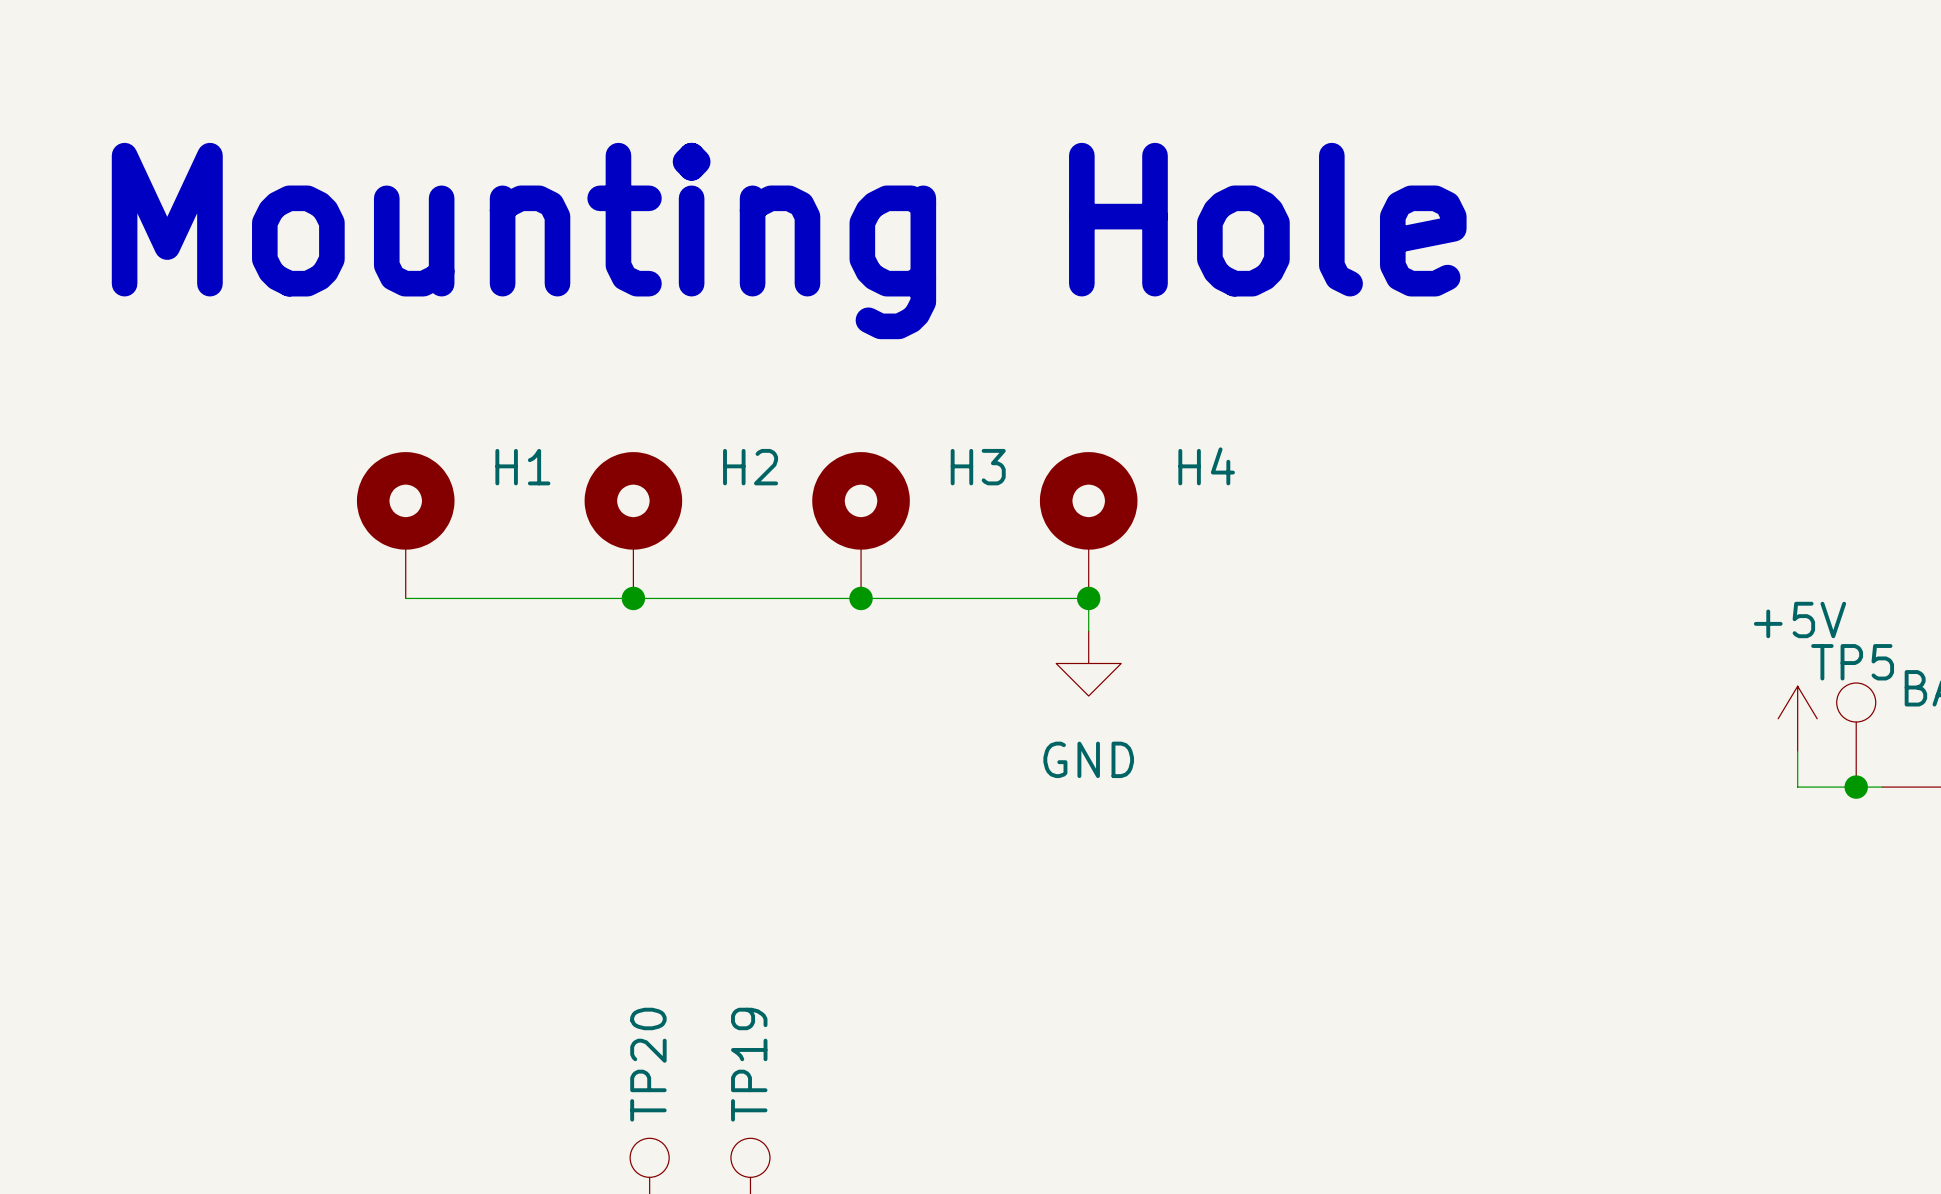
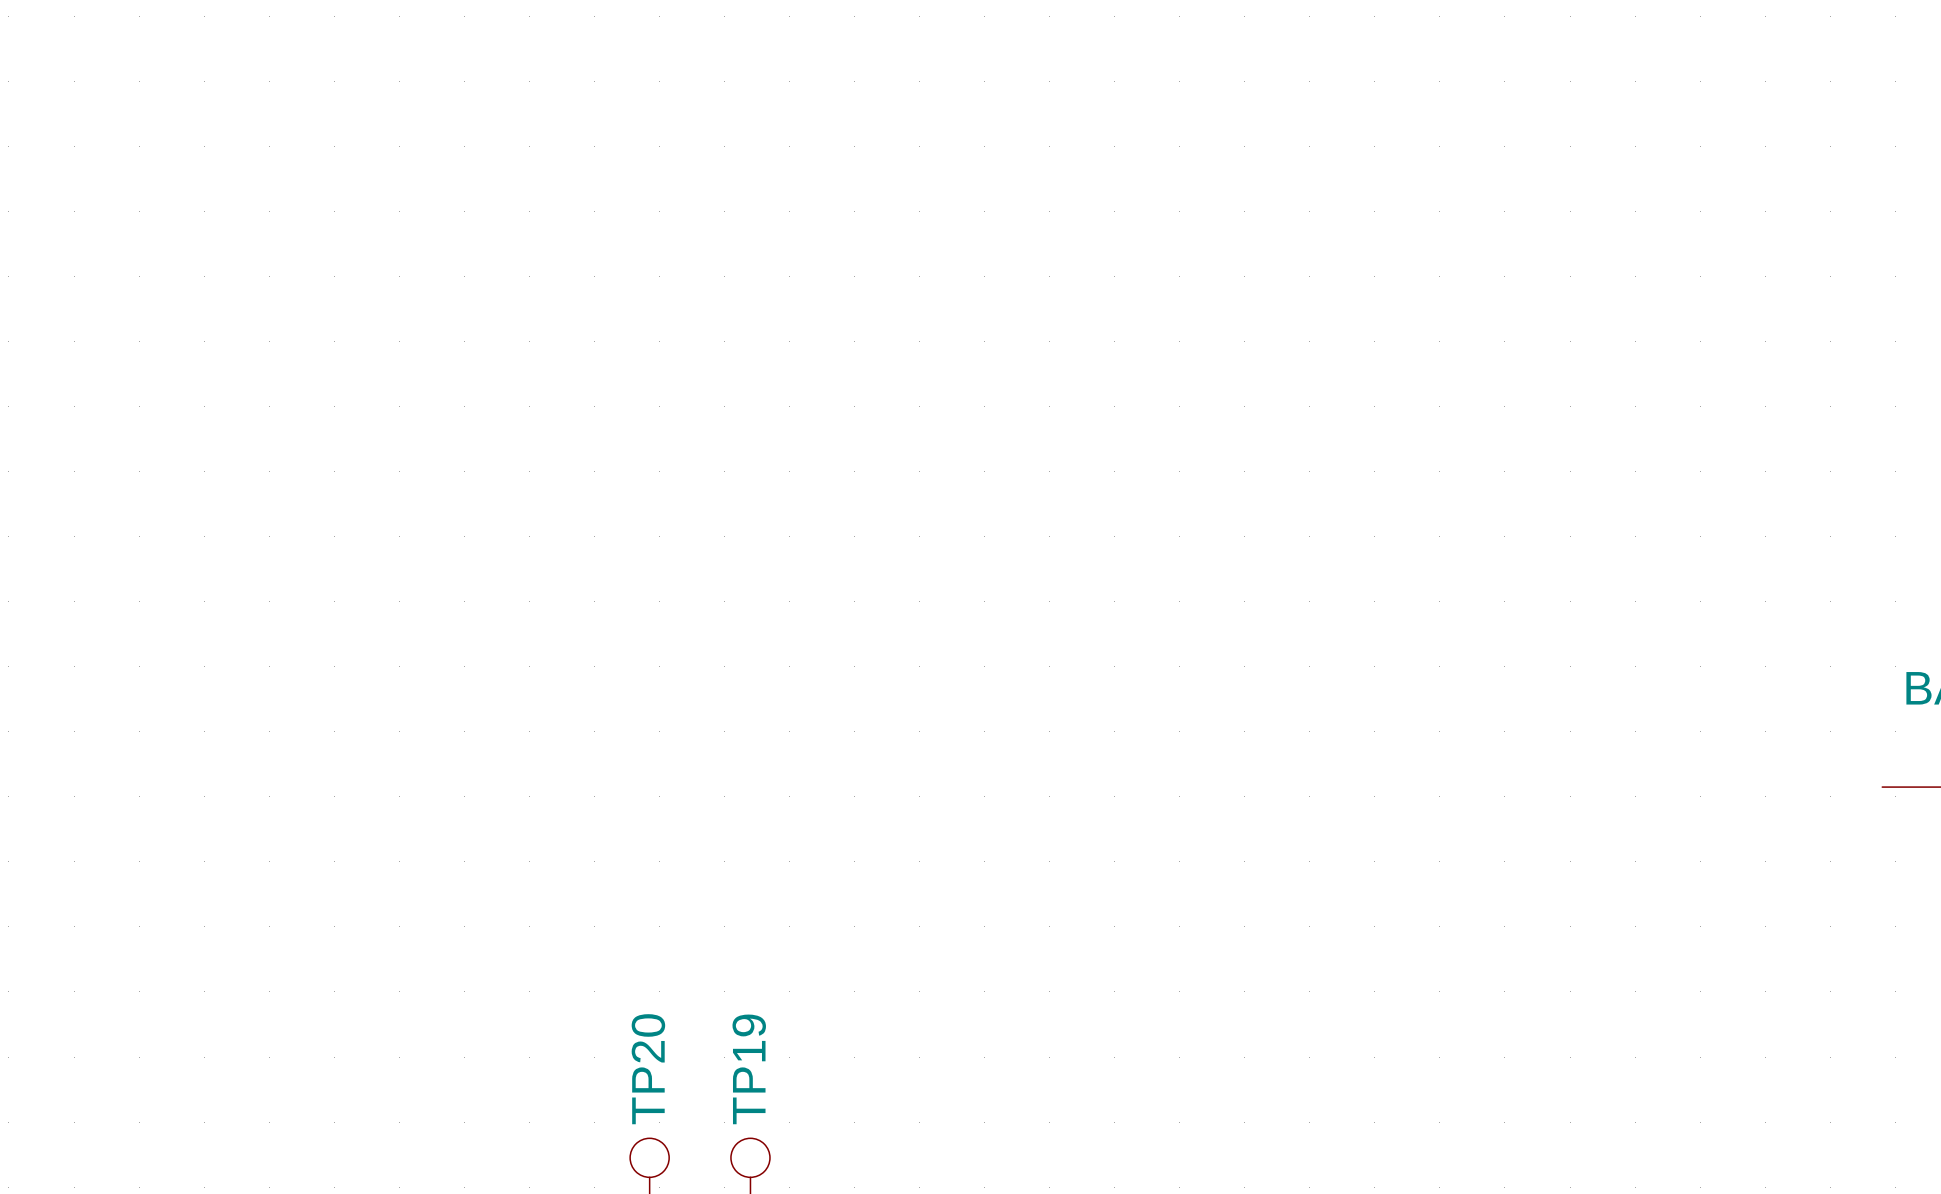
text: Mounting Hole (789, 240) -> none
H1: (405, 525) -> none
H2: (633, 525) -> none
H3: (861, 525) -> none
H4: (1088, 525) -> none
wire: (405, 598) (1088, 598) (1088, 630) -> none
junction: (633, 598) -> none
junction: (861, 598) -> none
junction: (1088, 598) -> none
power symbol: GND (1088, 663) -> none
power symbol: +5V (1797, 718) -> none
TP5: (1856, 735) -> none
wire: (1797, 751) (1797, 787) (1882, 787) -> none
junction: (1856, 787) -> none

